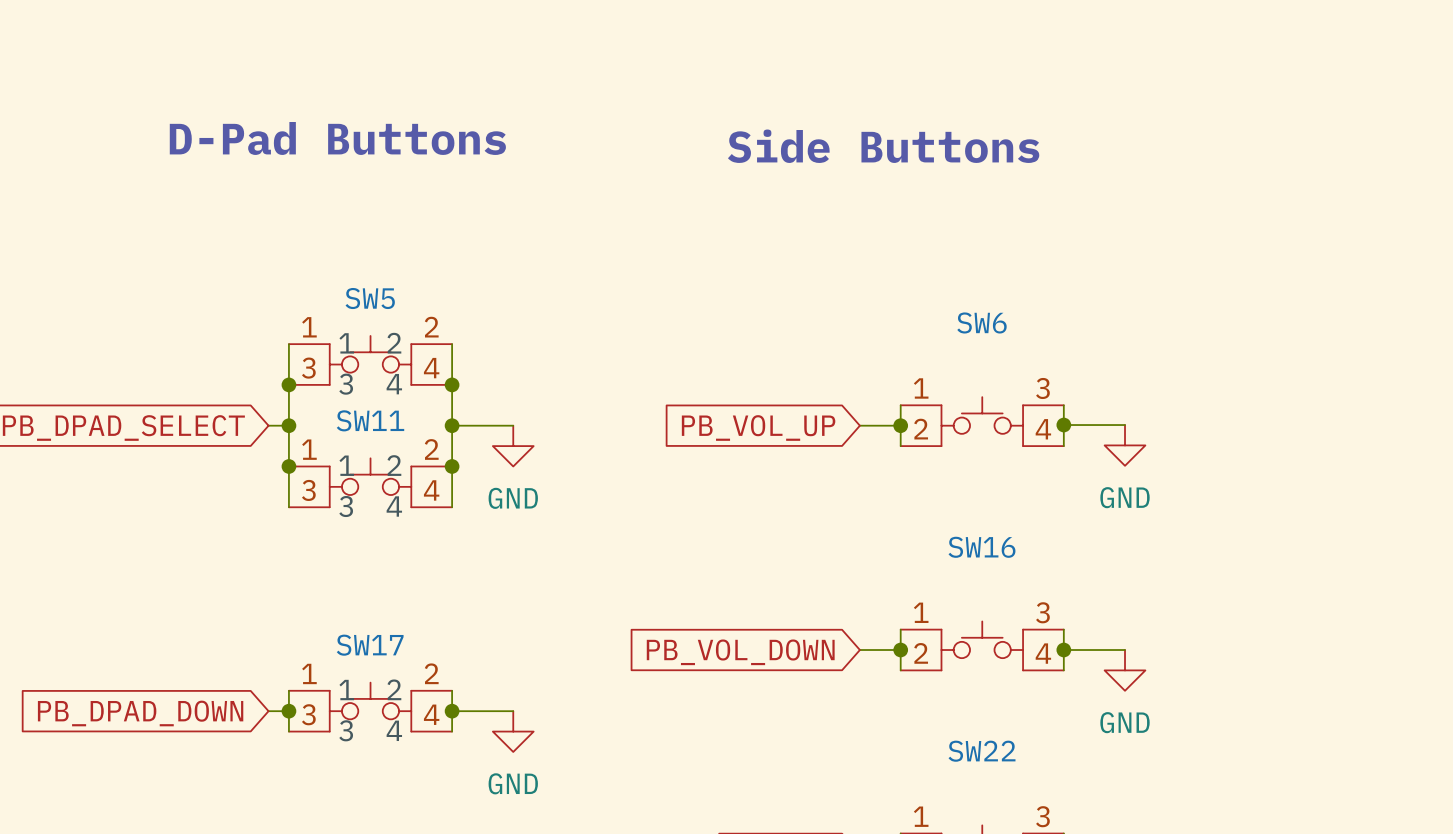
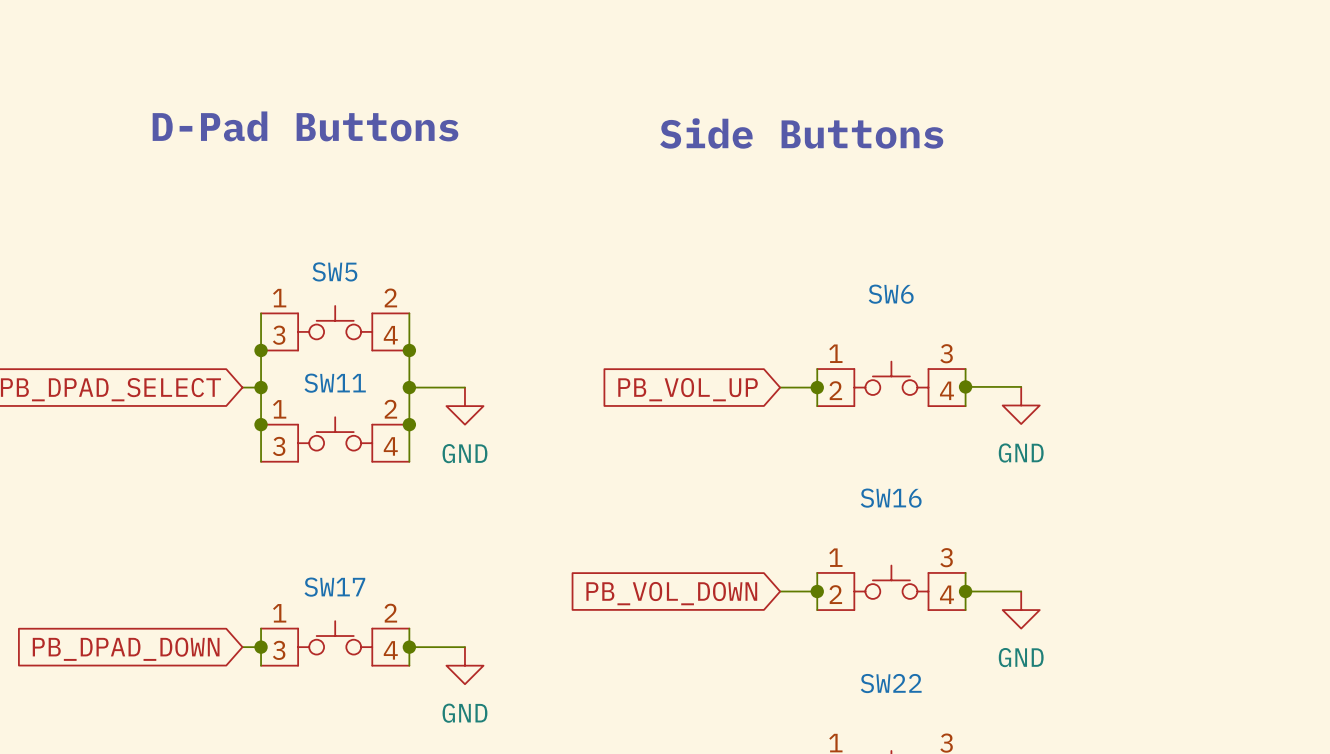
SW5 pin name: 1 (346, 343) -> none
SW5 pin name: 2 (394, 343) -> none
SW5 pin name: 3 (346, 384) -> none
SW5 pin name: 4 (394, 384) -> none
SW11 pin name: 1 (346, 465) -> none
SW11 pin name: 2 (394, 465) -> none
SW11 pin name: 3 (346, 506) -> none
SW11 pin name: 4 (394, 506) -> none
SW17 pin name: 2 (394, 689) -> none
SW17 pin name: 1 (346, 690) -> none
SW17 pin name: 3 (346, 730) -> none
SW17 pin name: 4 (394, 730) -> none

